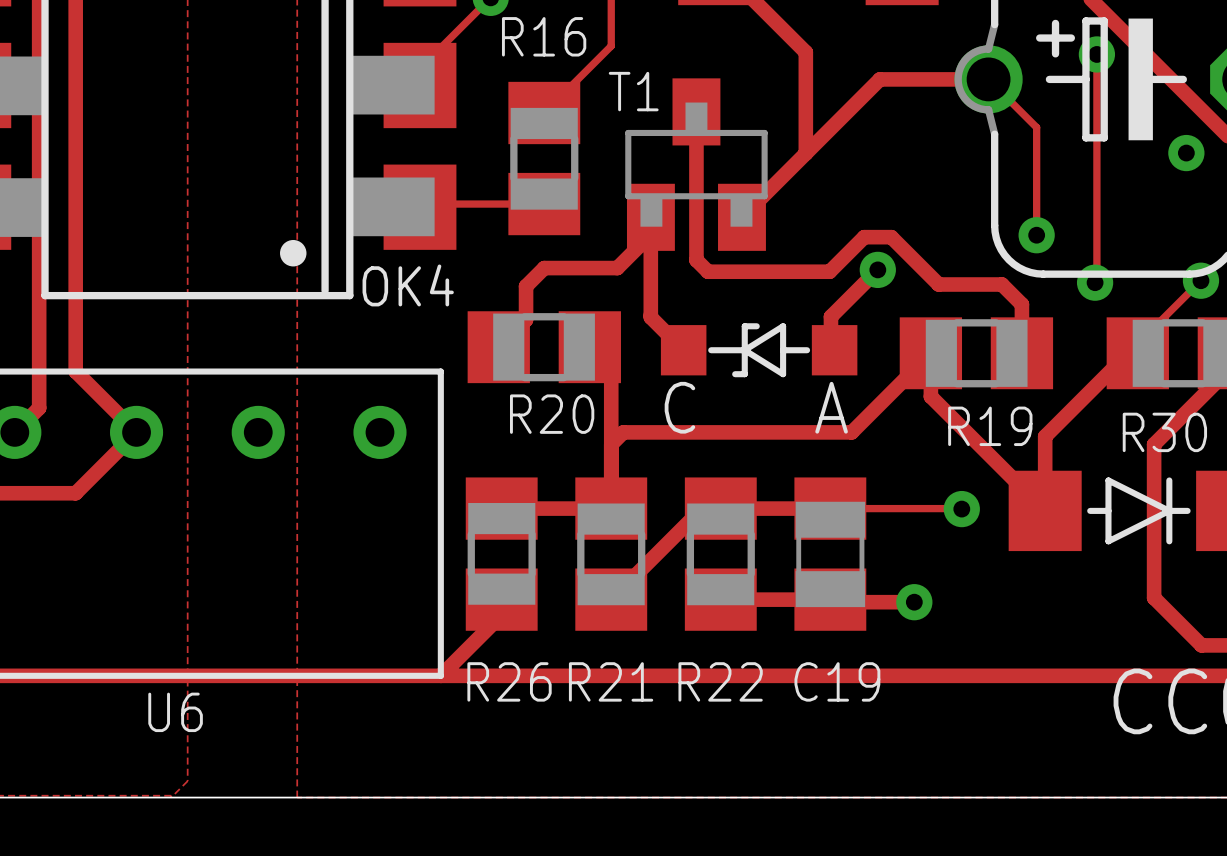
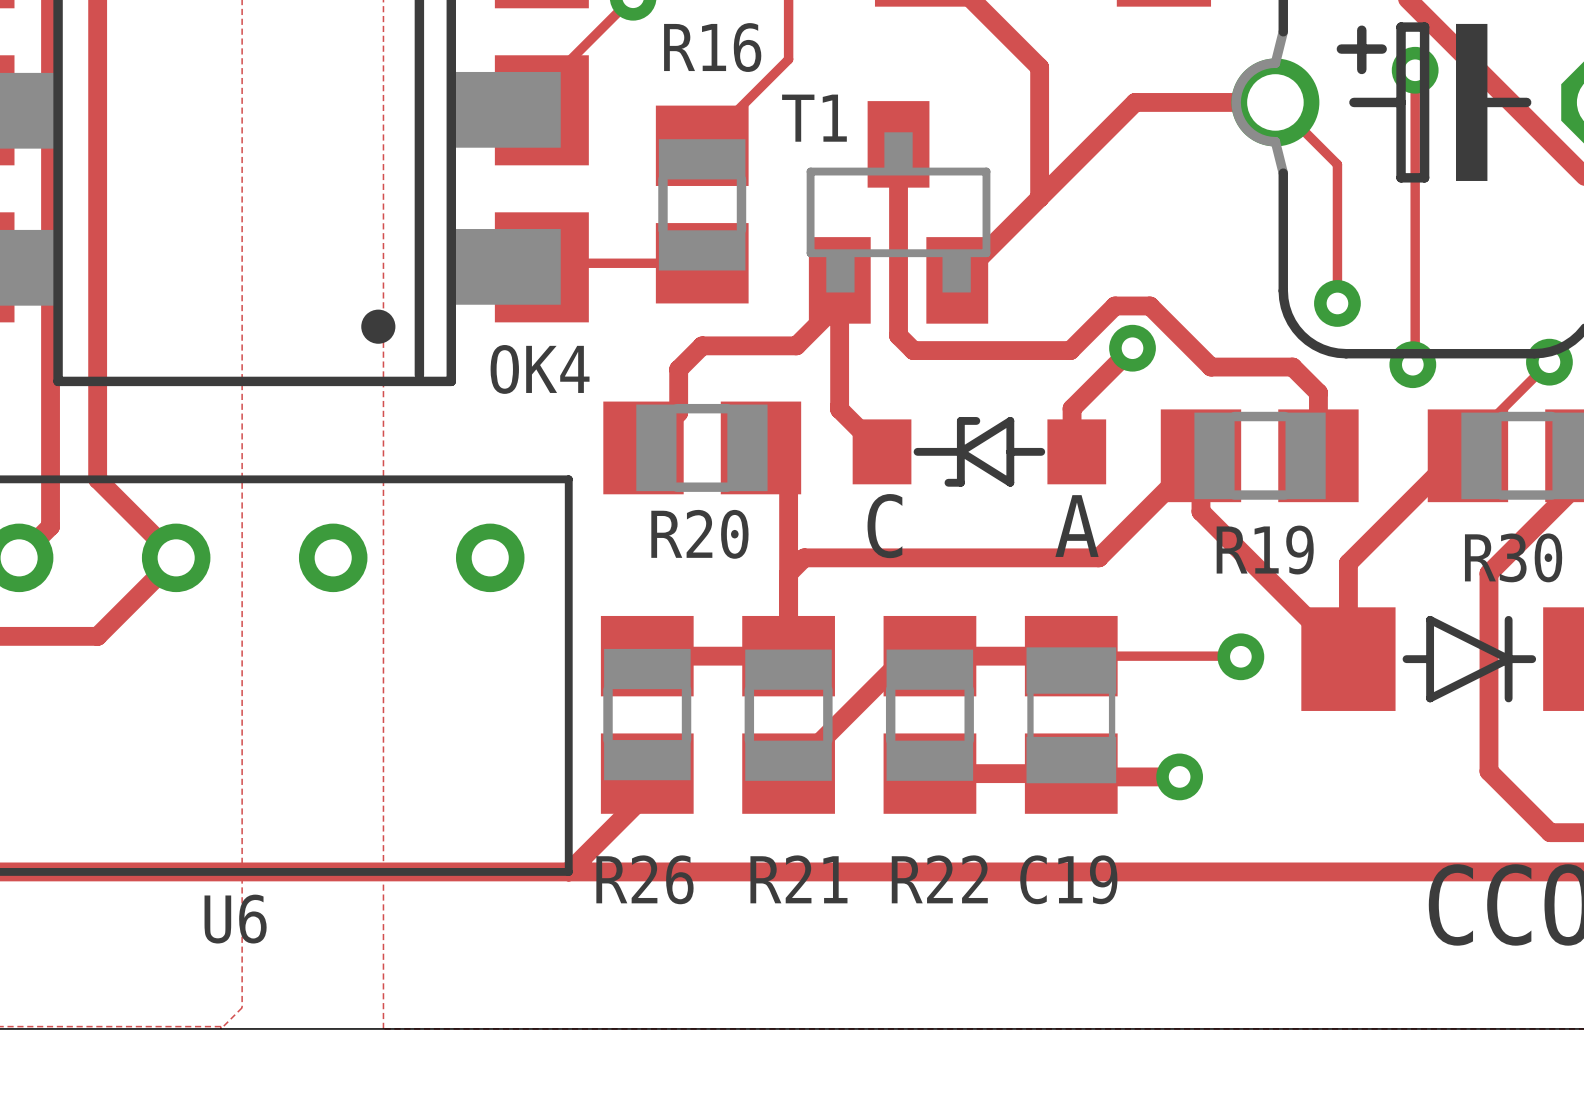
via: (1186, 153) -> none

